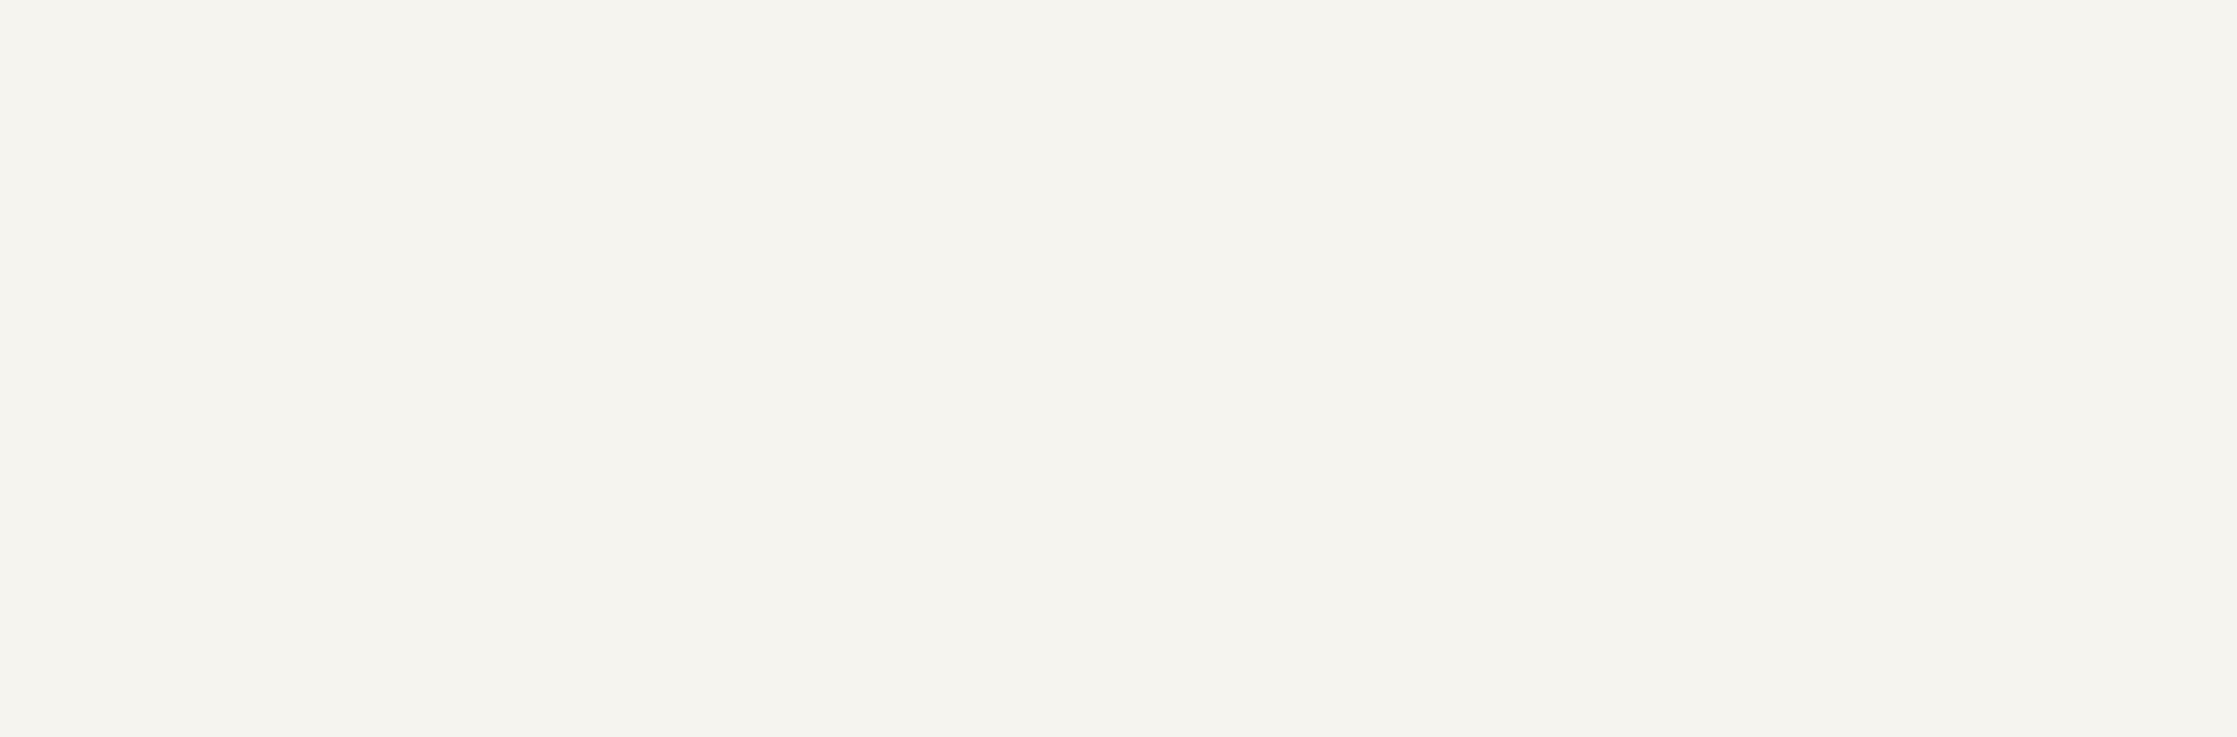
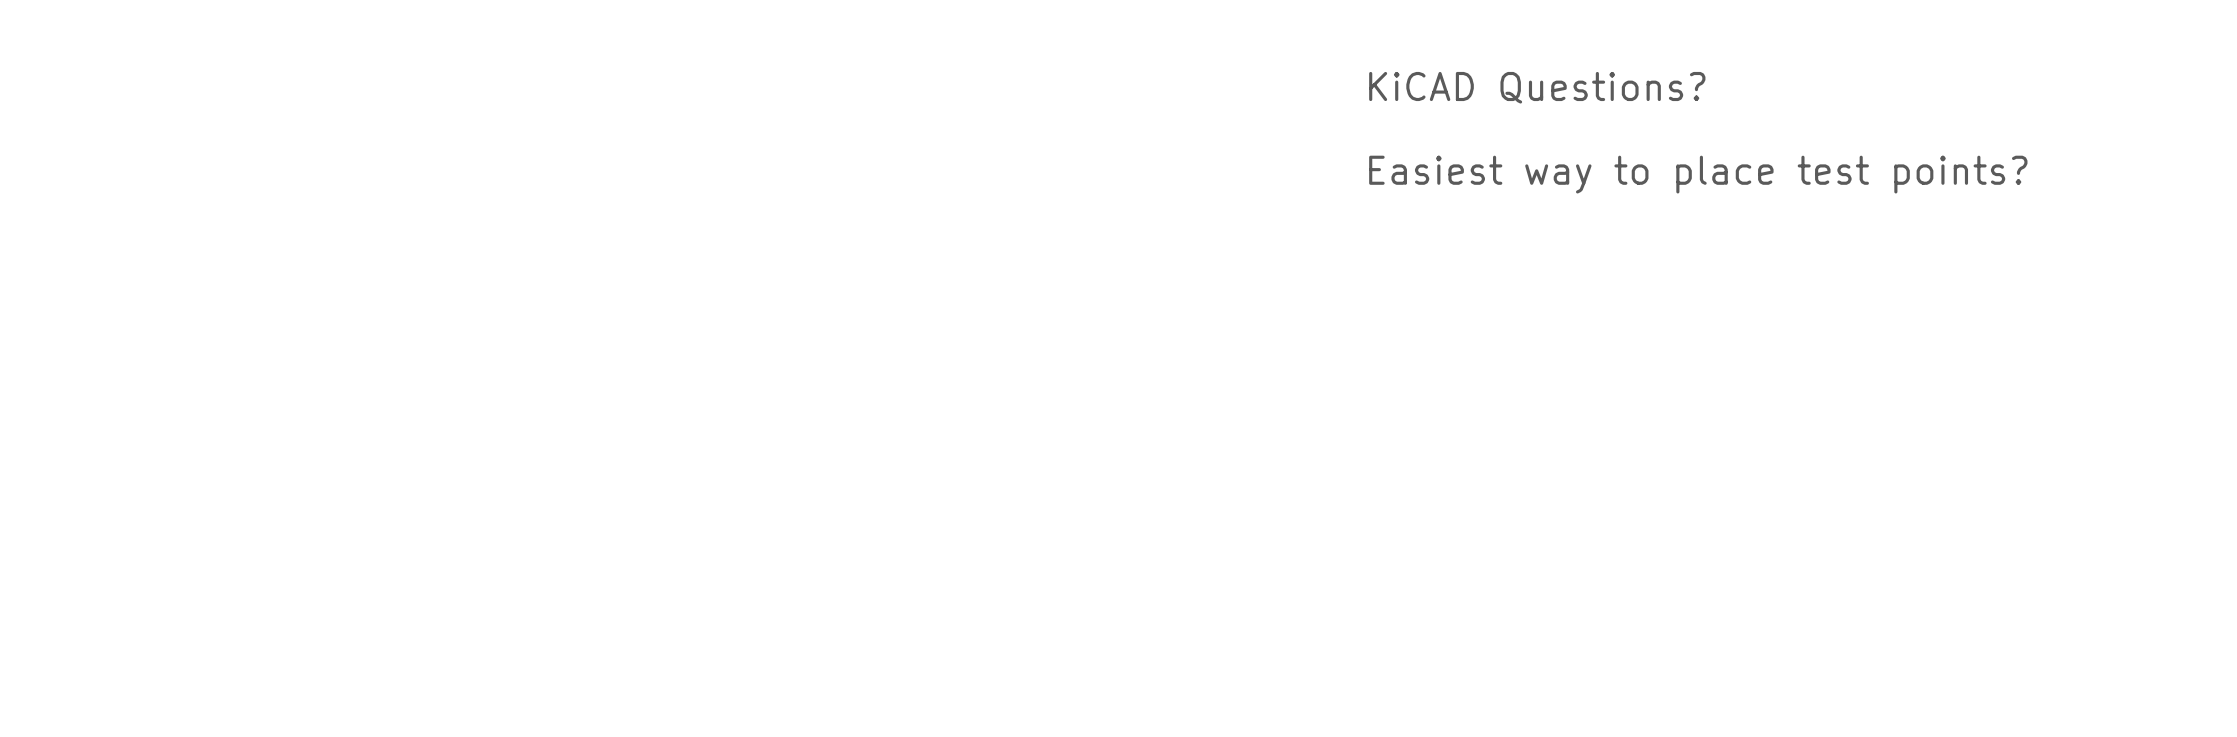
text: none -> KiCAD Questions? (1537, 87)
text: none -> Easiest way to place test points? (1698, 174)

